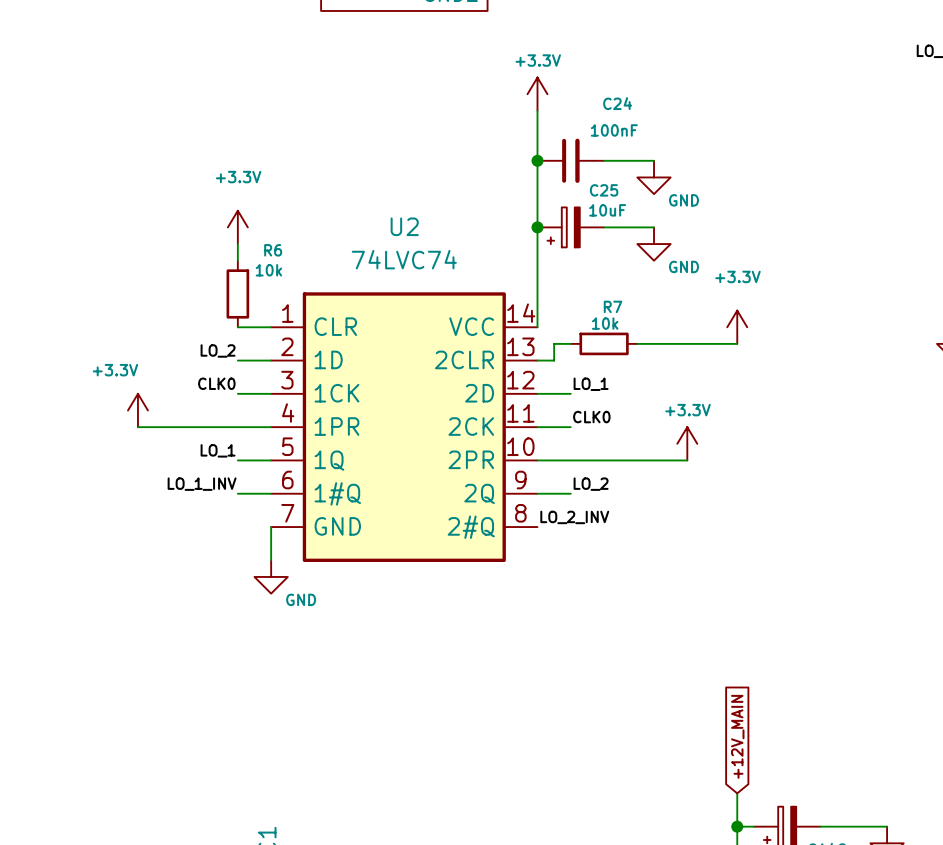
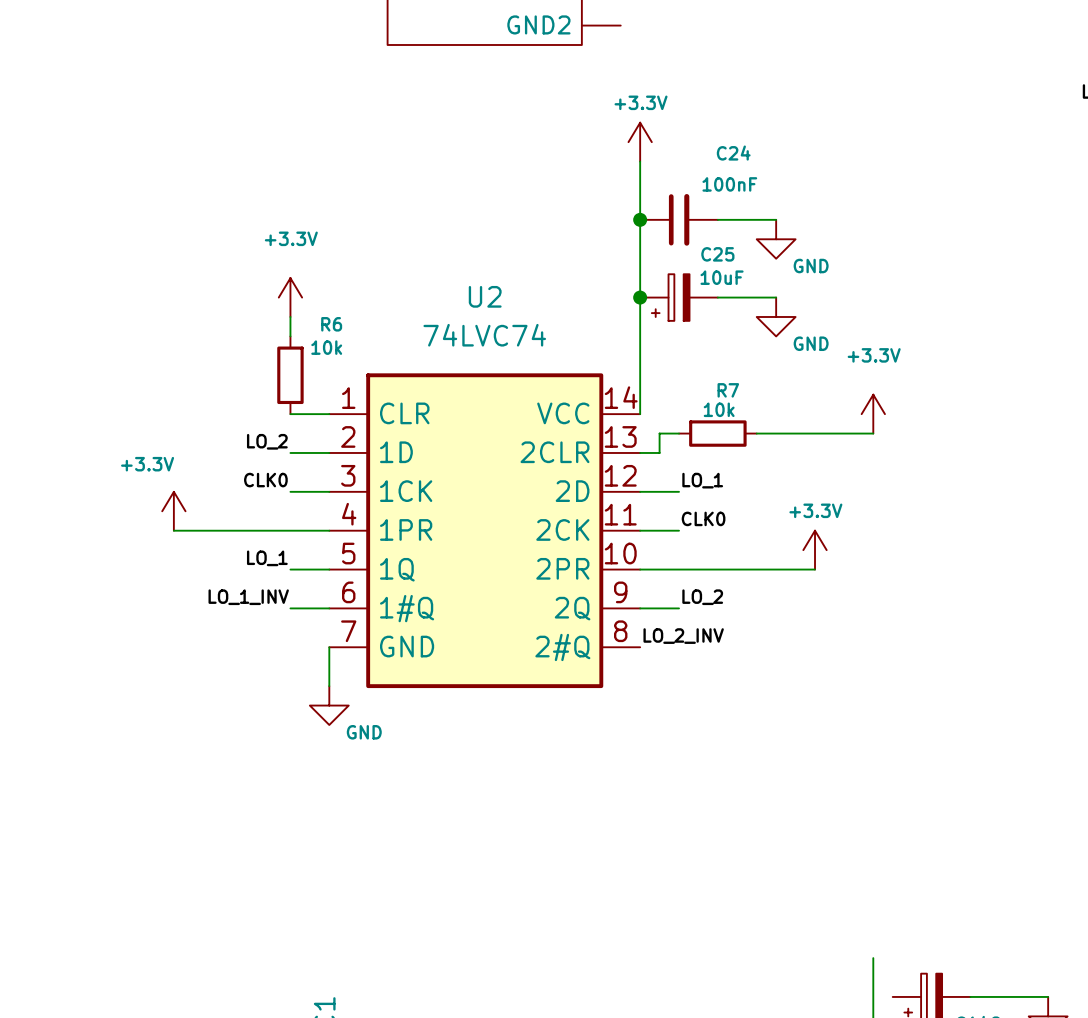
global label: +12V_MAIN (737, 736) -> none
wire: (737, 826) (753, 826) -> none
junction: (737, 826) -> none

